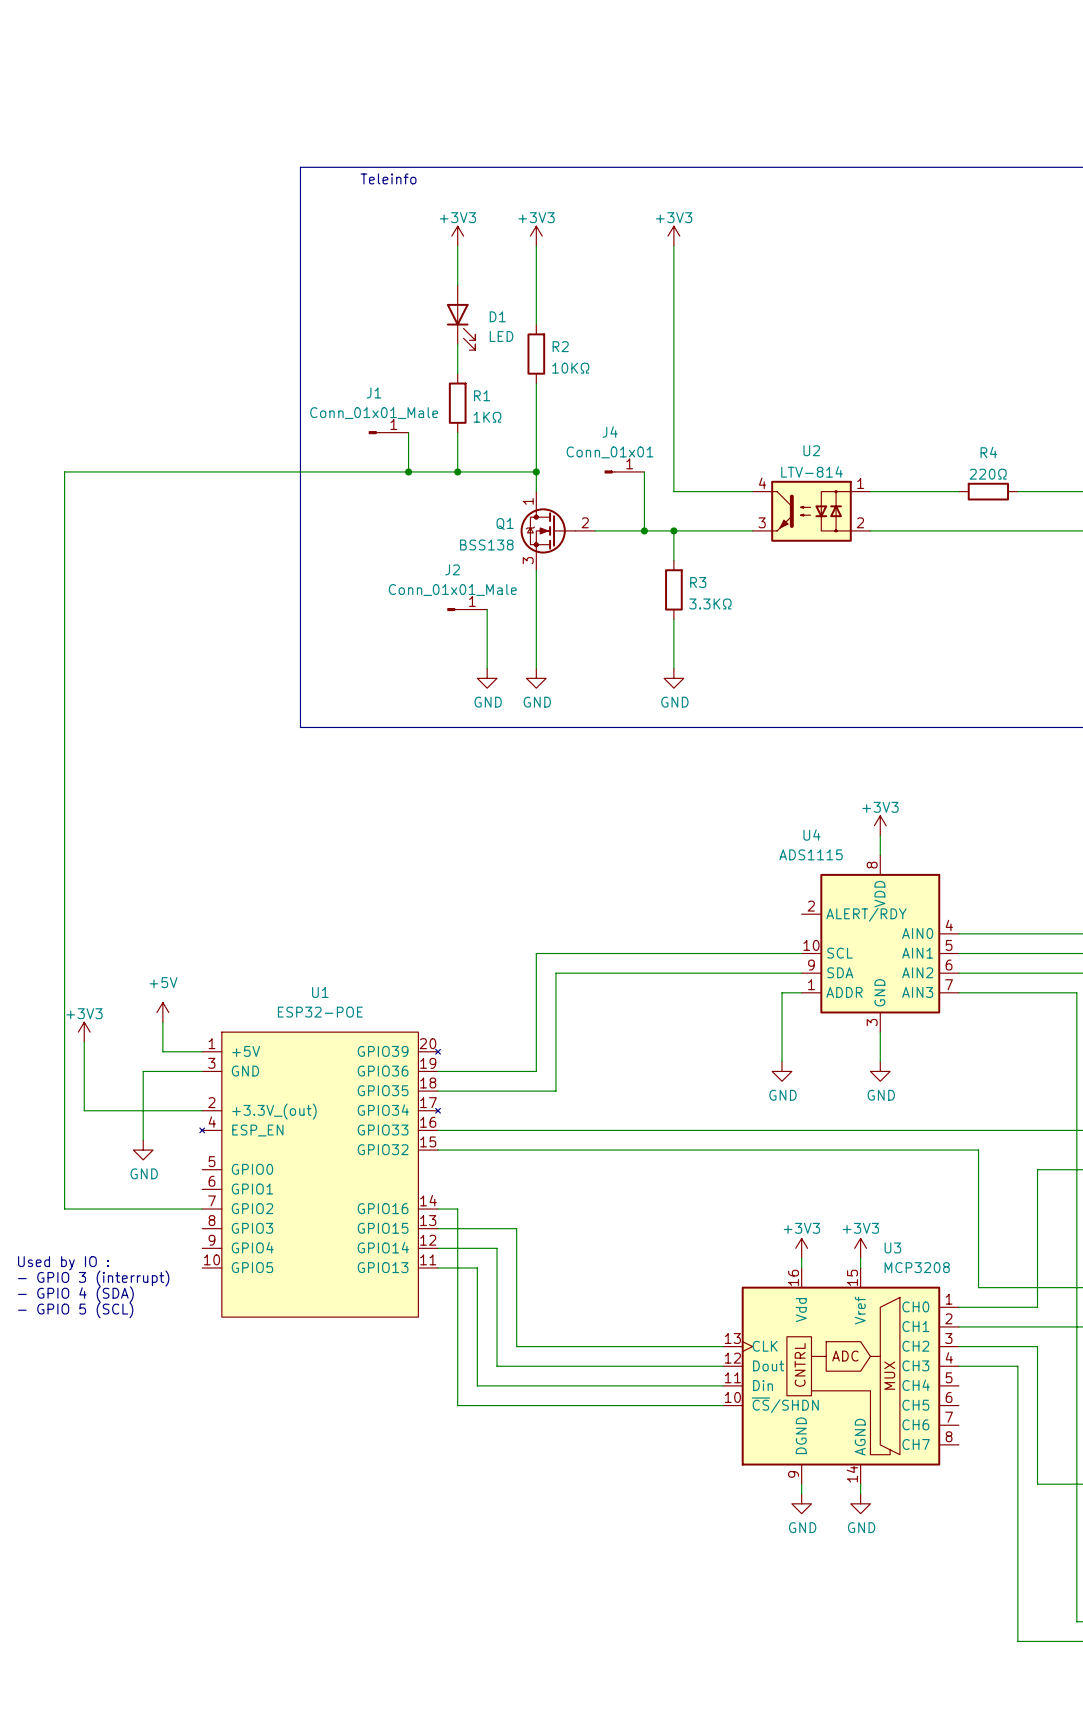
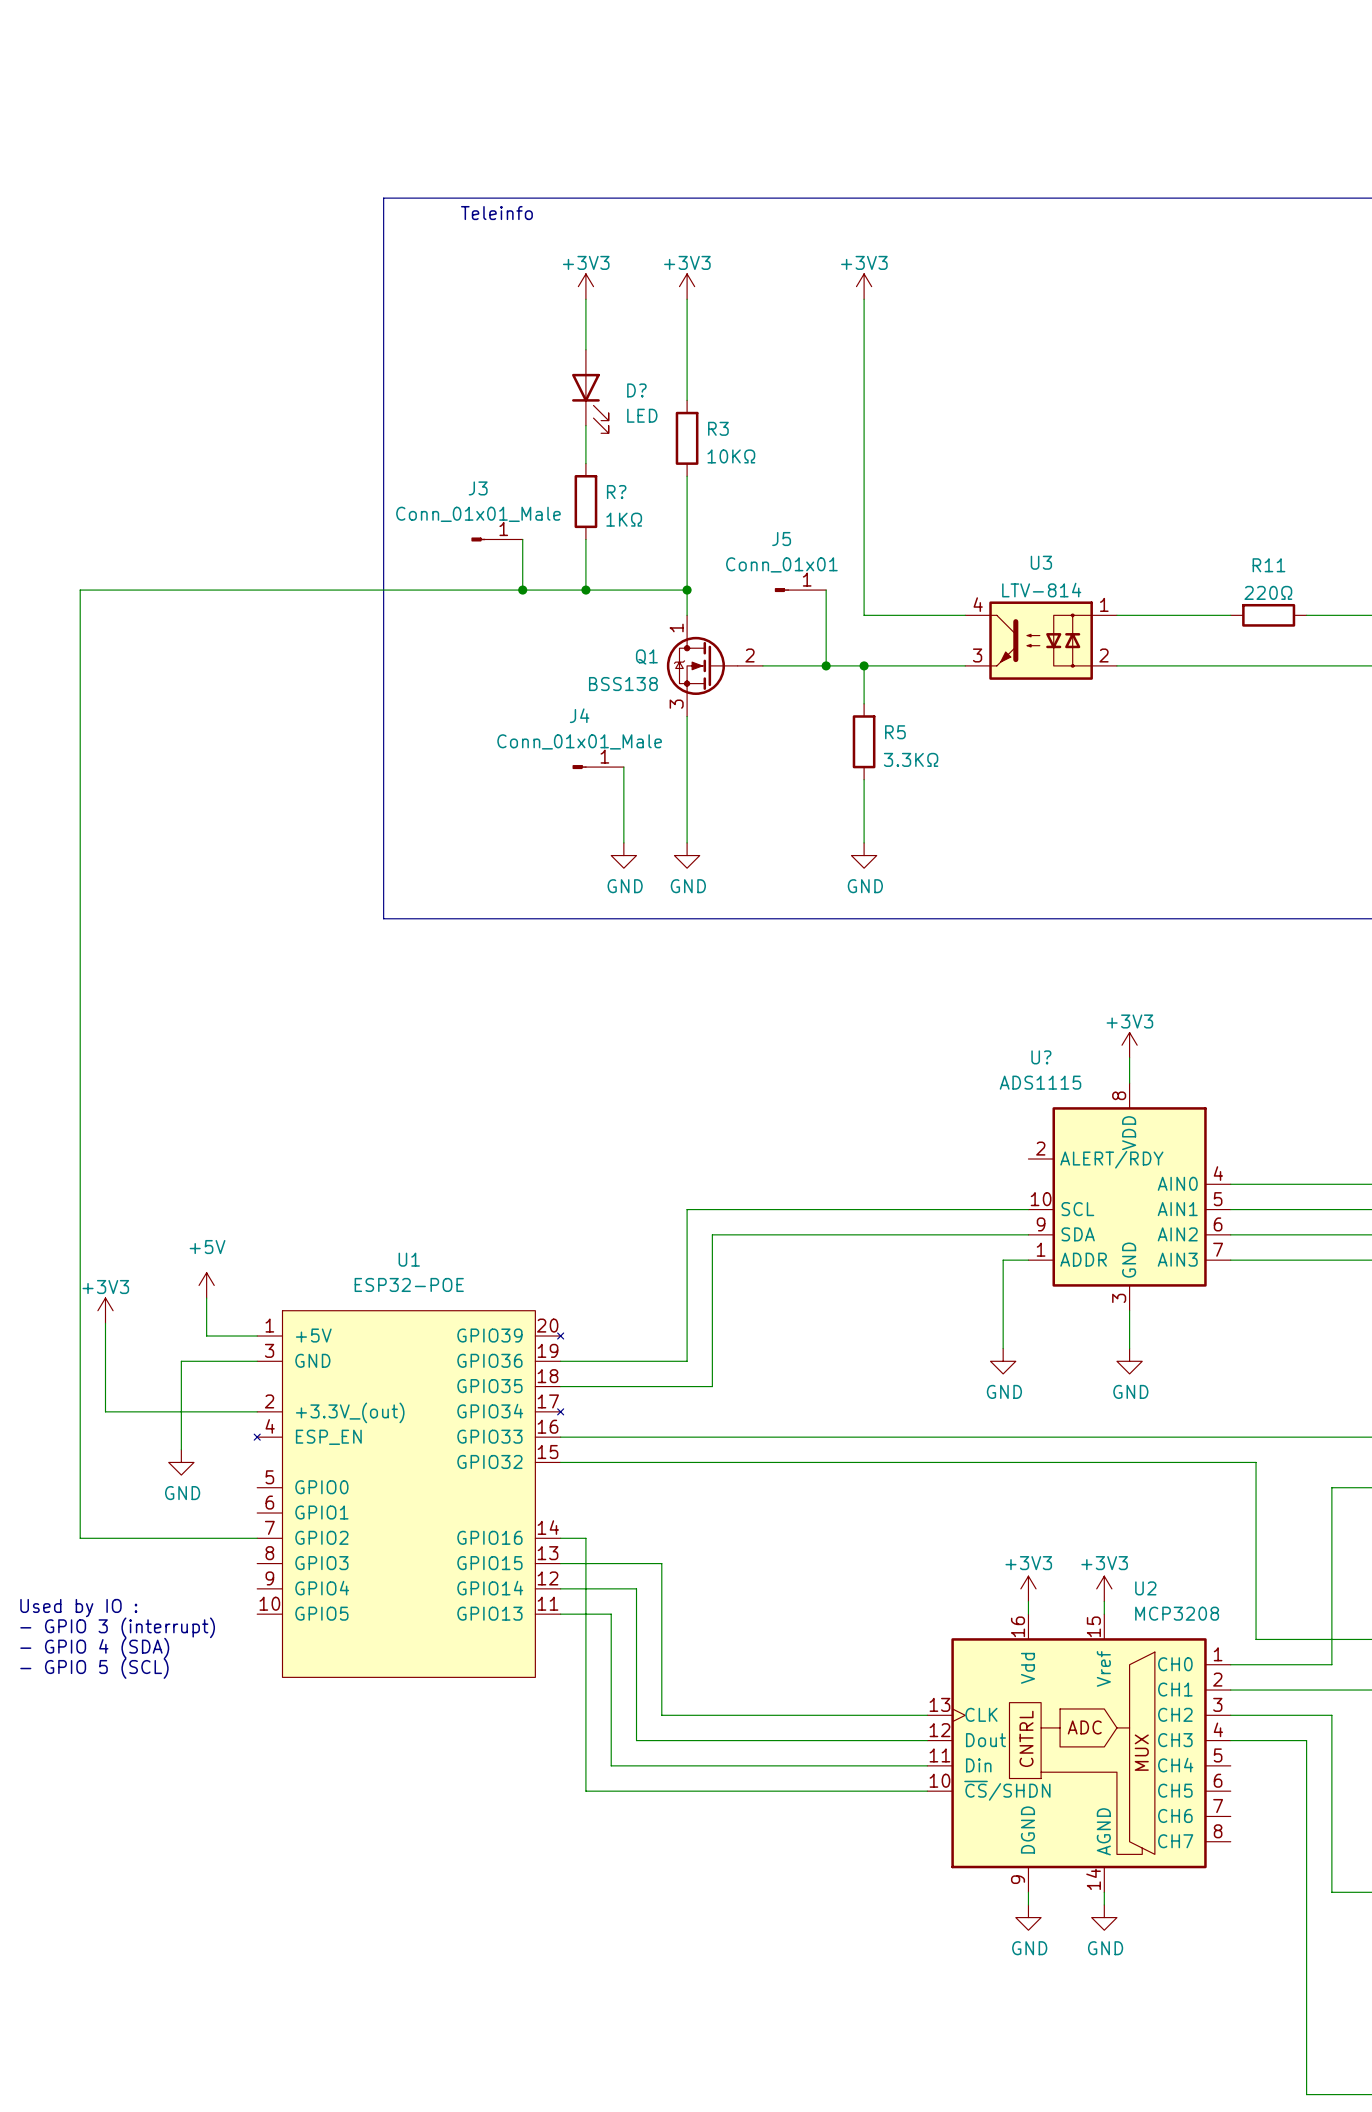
D1 name: D1 (497, 316) -> D? (636, 390)
R2 name: R2 (560, 346) -> R3 (718, 428)
J1 name: J1 (373, 392) -> J3 (478, 488)
R1 name: R1 (482, 395) -> R? (616, 492)
J4 name: J4 (610, 432) -> J5 (781, 539)
U2 name: U2 (811, 450) -> U3 (1041, 562)
R4 name: R4 (988, 452) -> R11 (1268, 565)
J2 name: J2 (452, 569) -> J4 (579, 715)
R3 name: R3 (698, 582) -> R5 (895, 732)
U4 name: U4 (811, 834) -> U? (1041, 1057)
U3 name: U3 (892, 1247) -> U2 (1145, 1588)

